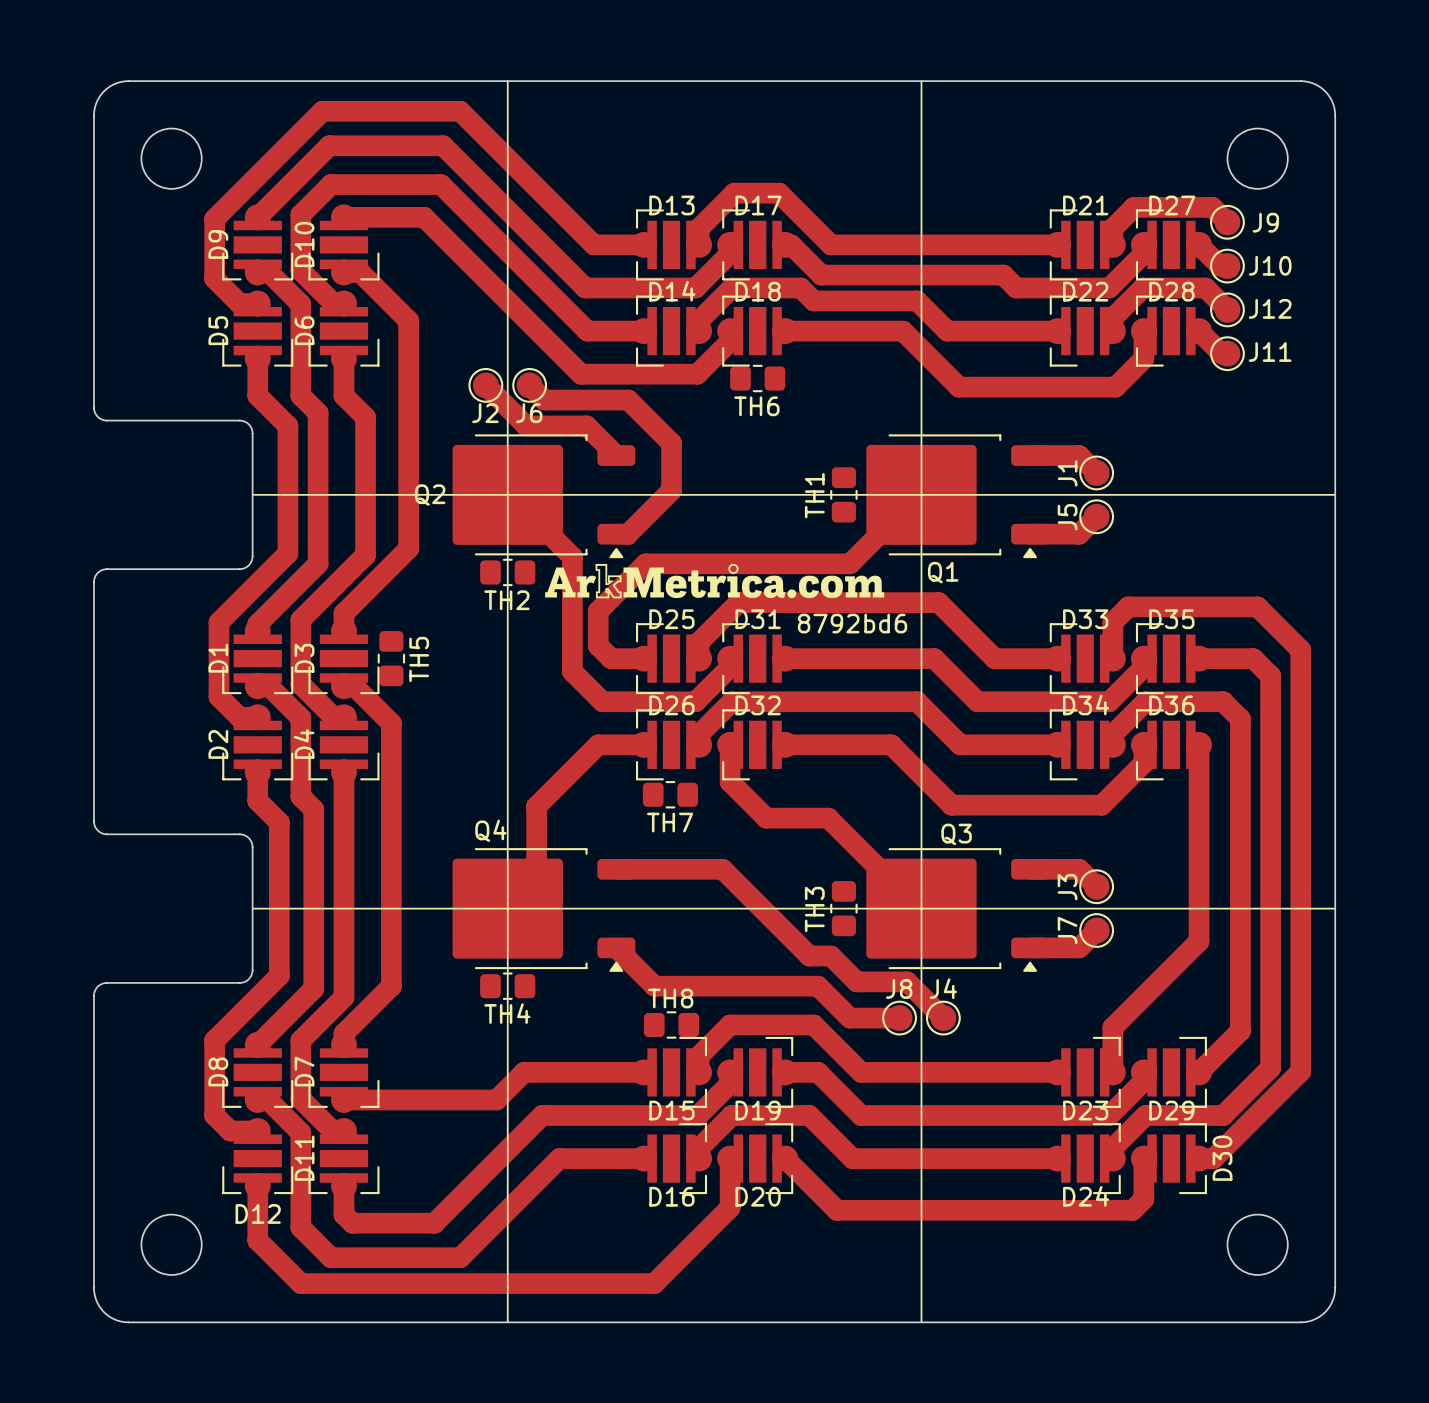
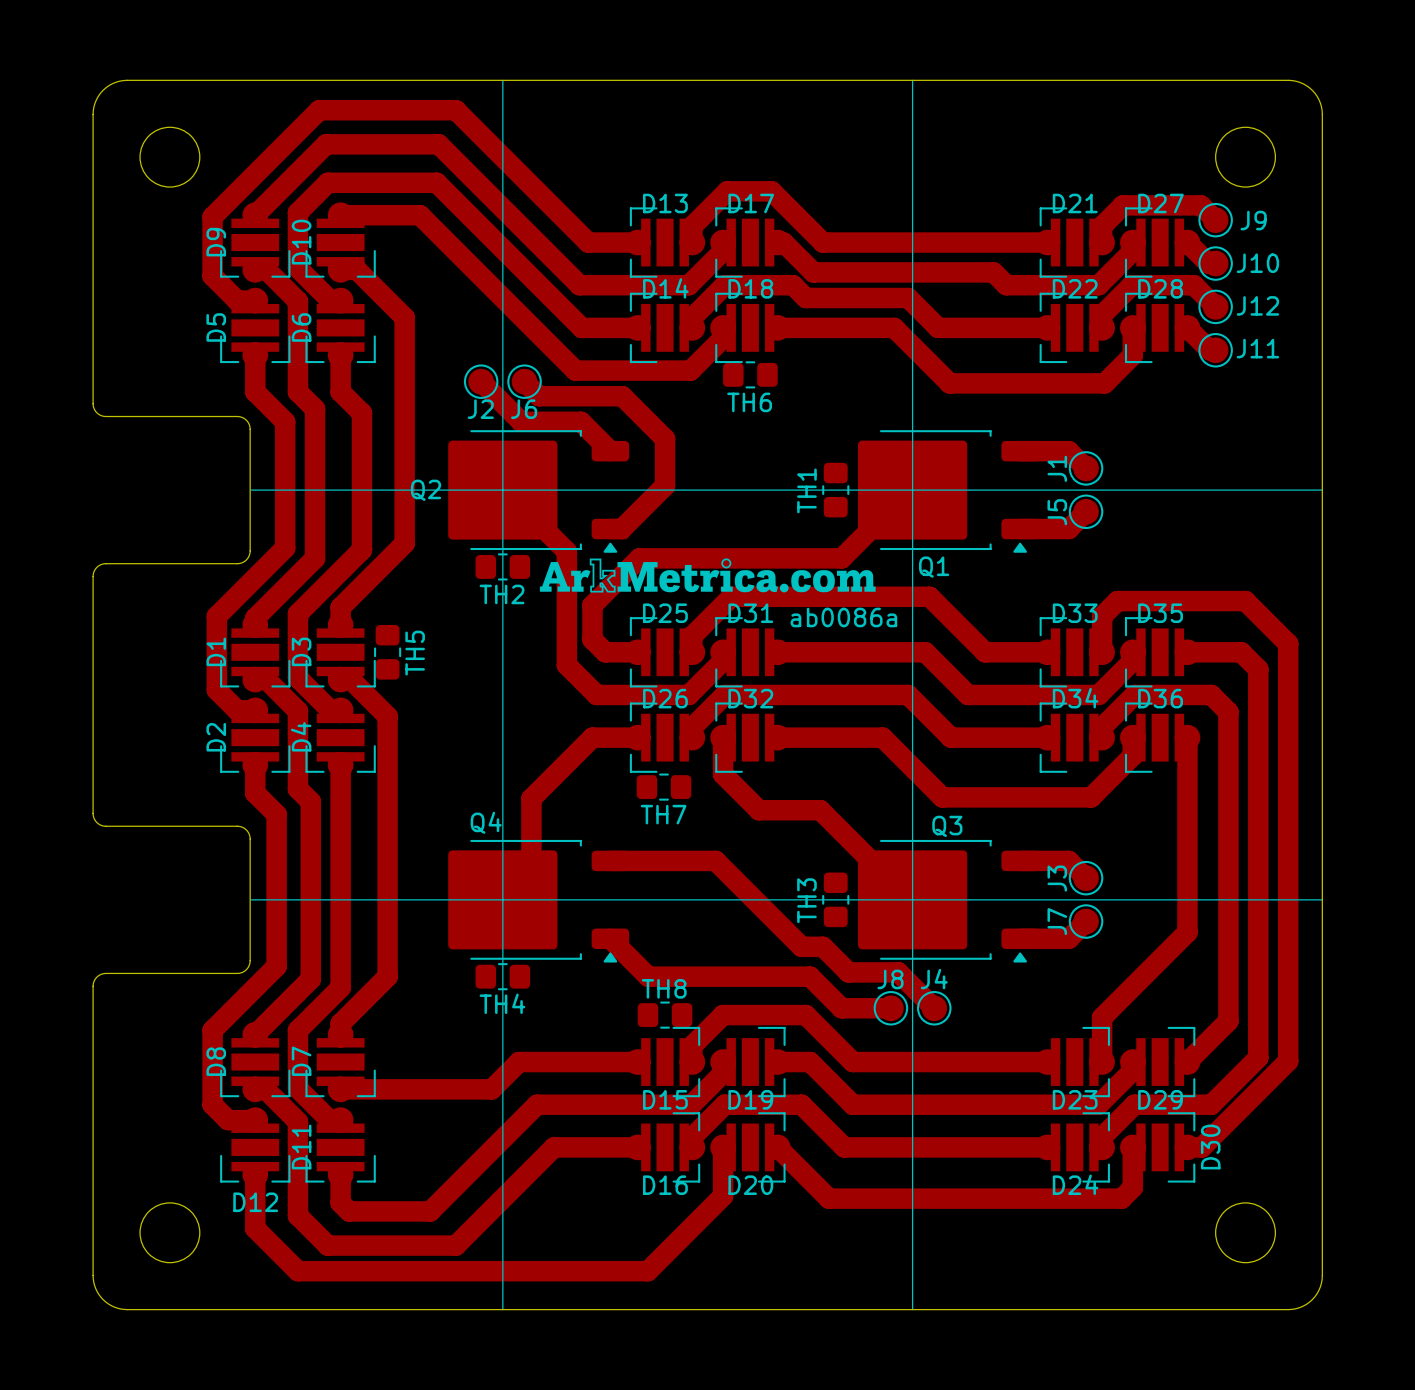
text: 8792bd6 (852, 623) -> ab0086a (843, 617)

